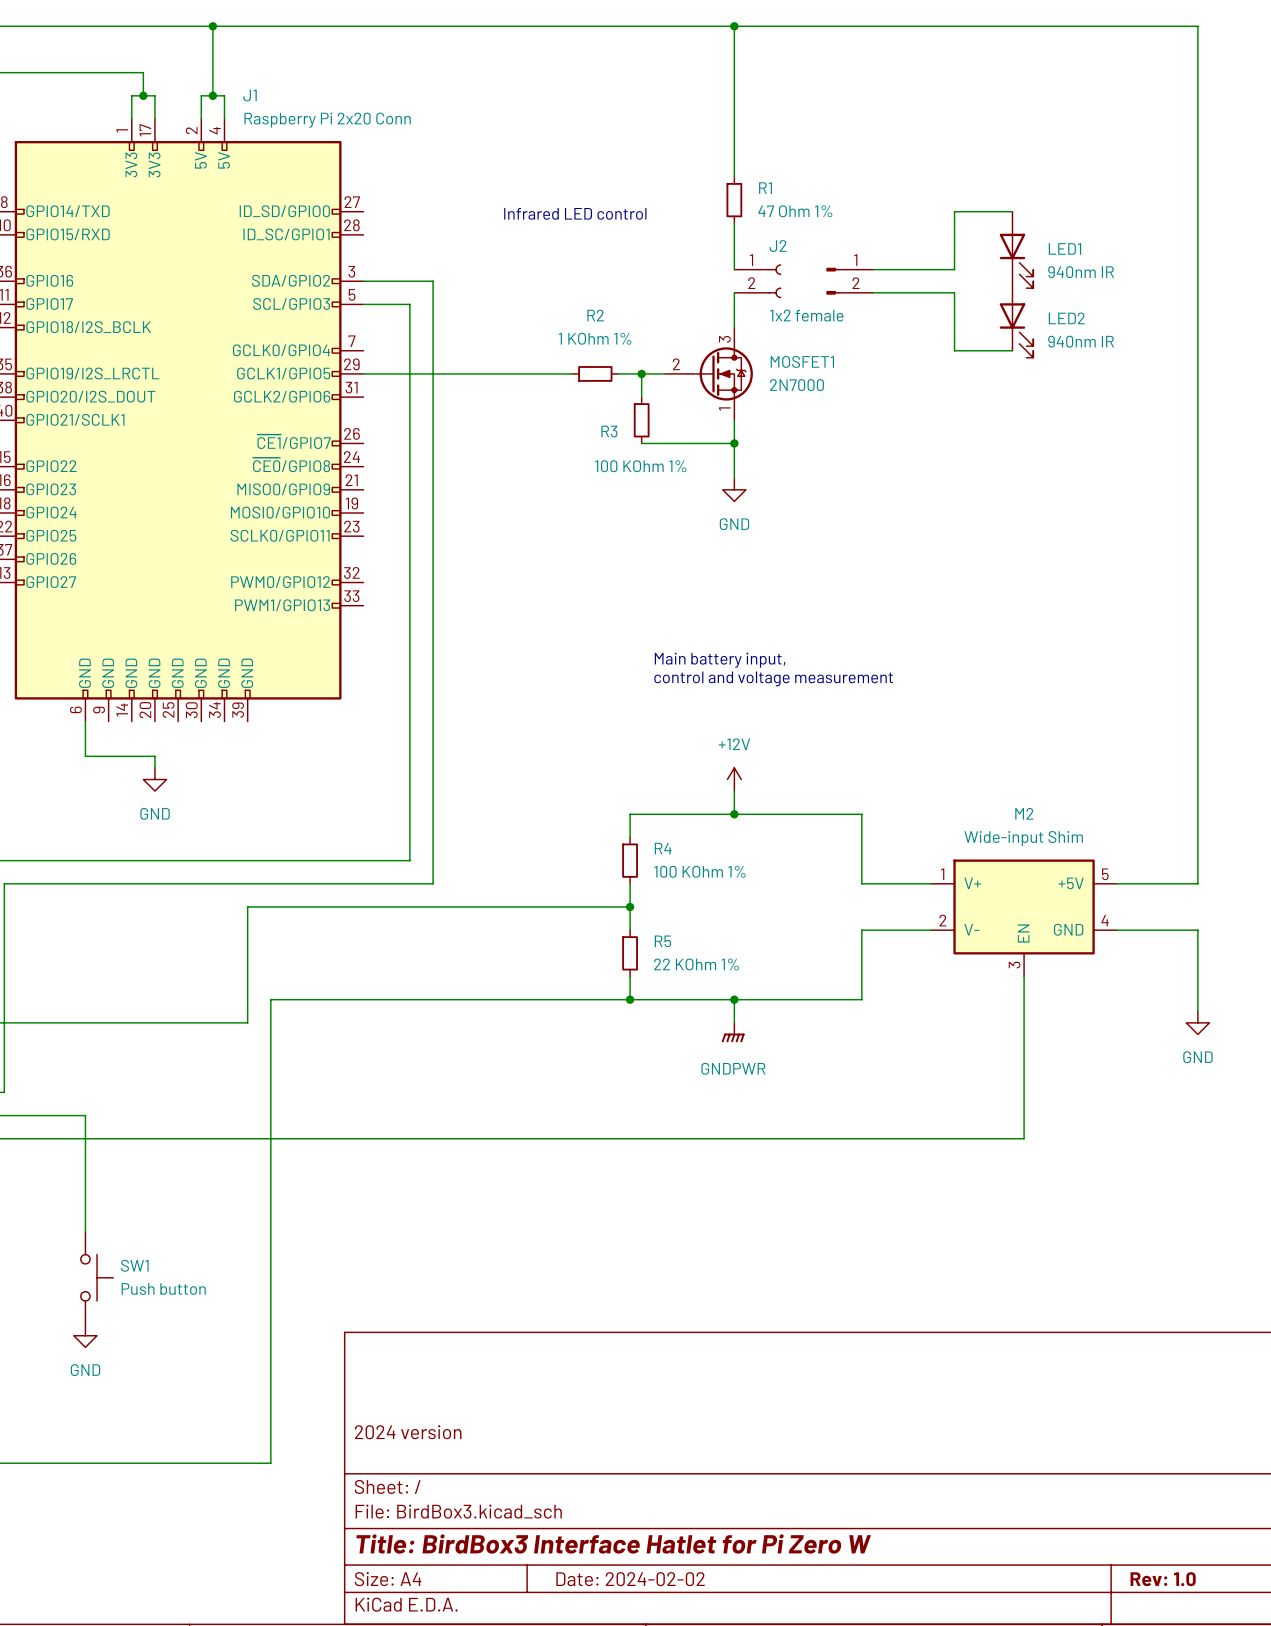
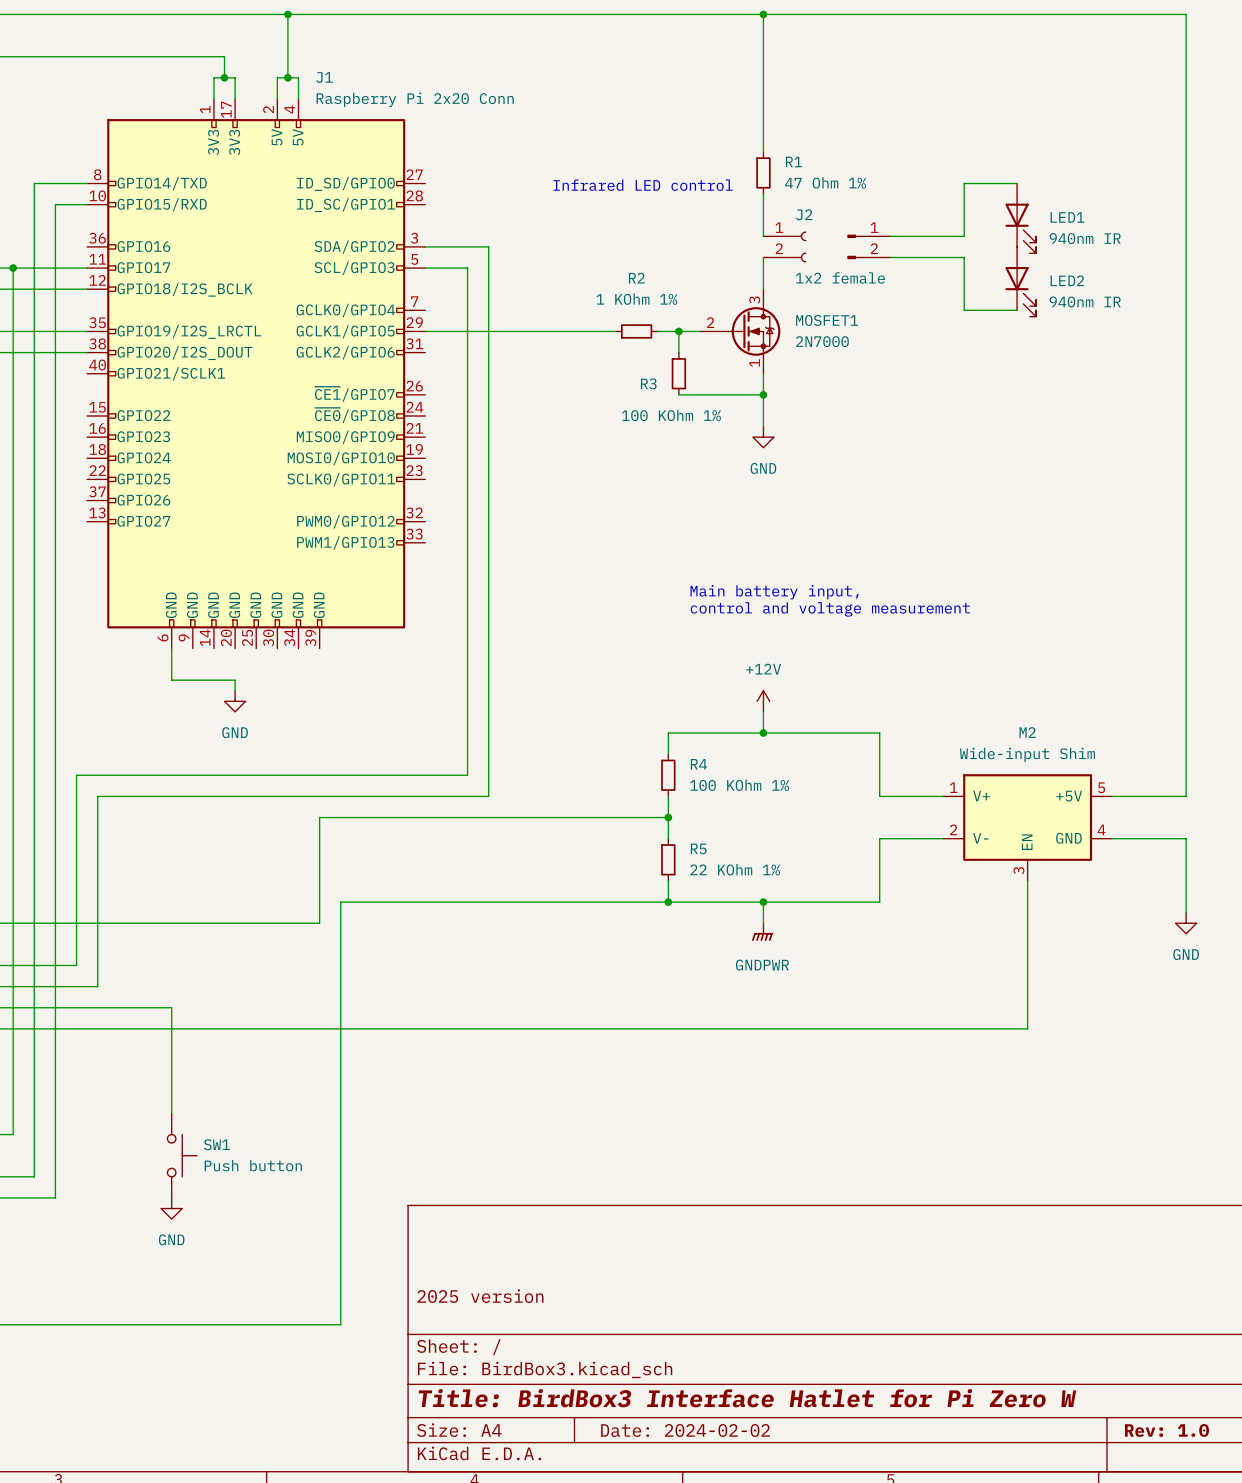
title block: 2024 version (408, 1432) -> 2025 version (480, 1296)

